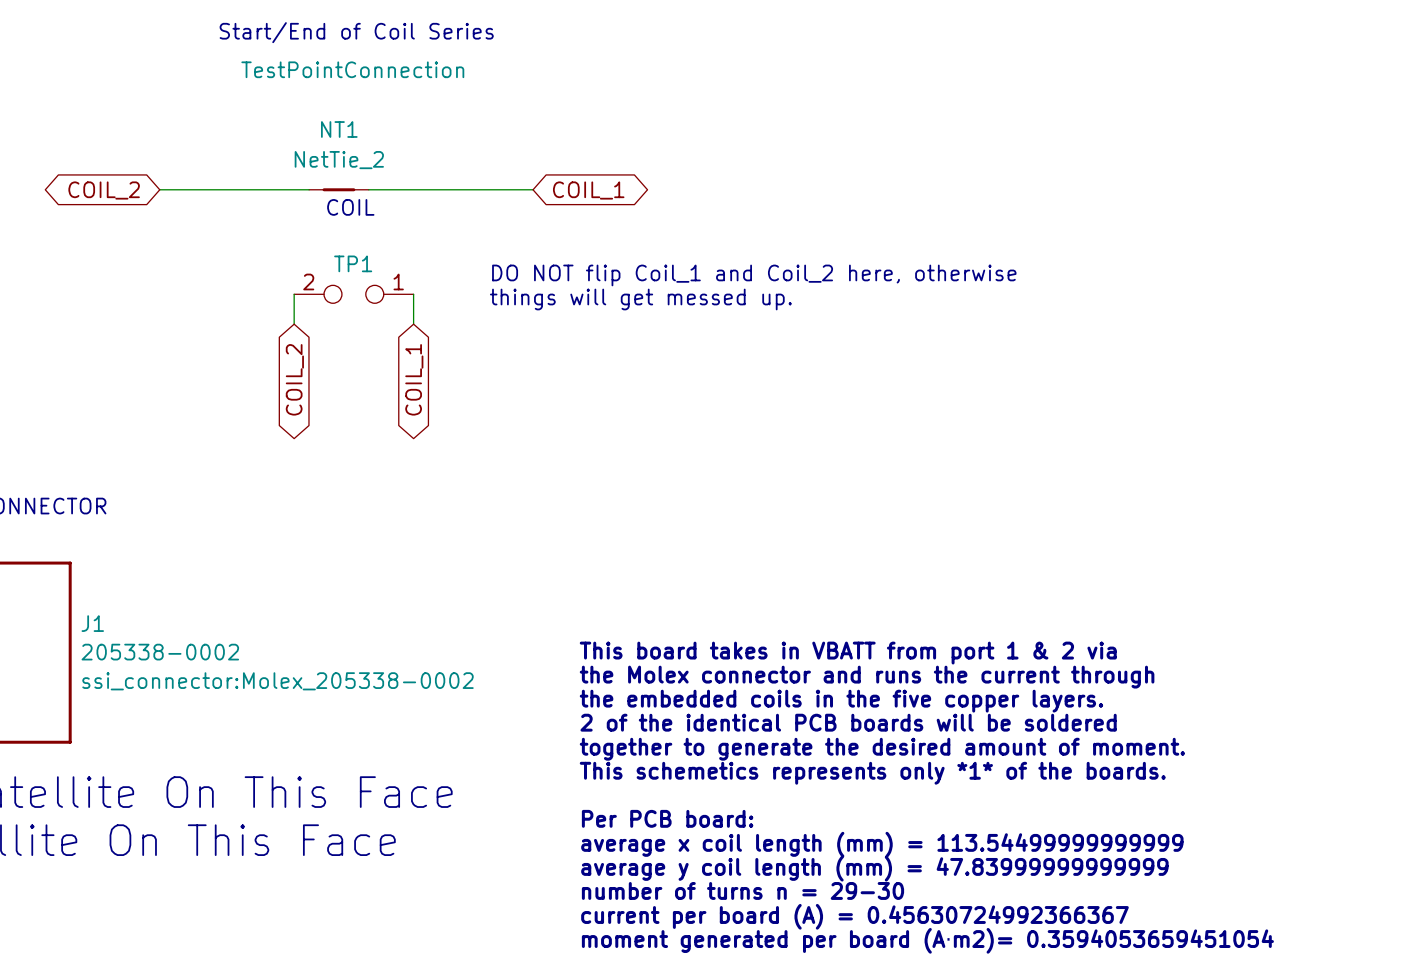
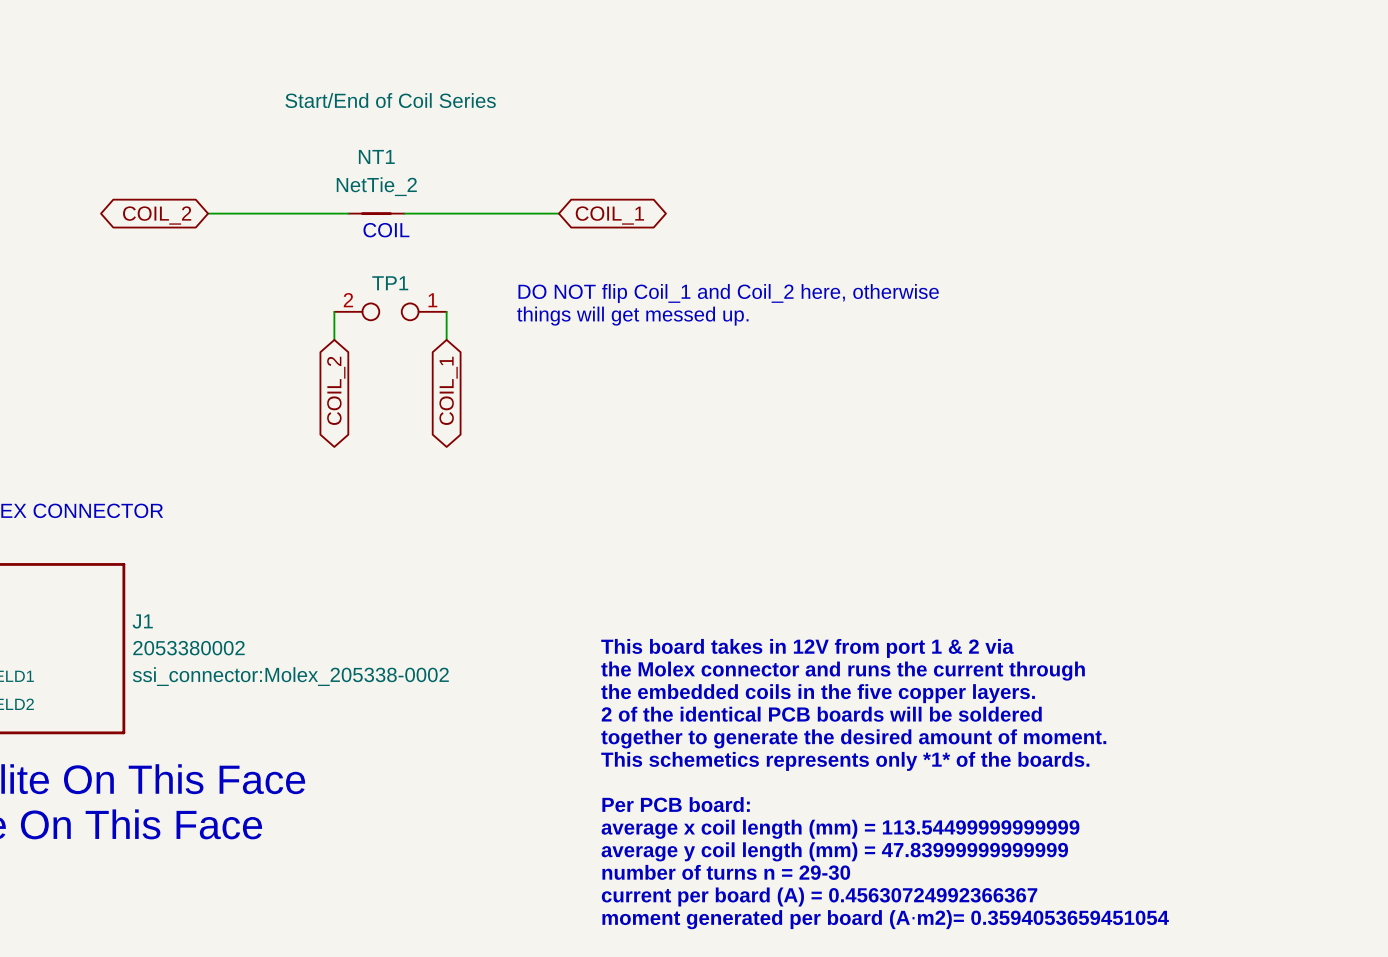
text: Start/End of Coil Series (356, 32) -> none
TP1 value: TestPointConnection (352, 69) -> Start/End of Coil Series (390, 100)
J1 value: 205338-0002 (160, 652) -> 2053380002 (189, 648)
text: This board takes in VBATT from port 1 & 2 via (848, 653) -> This board takes in 12V from port 1 & 2 via (807, 648)

